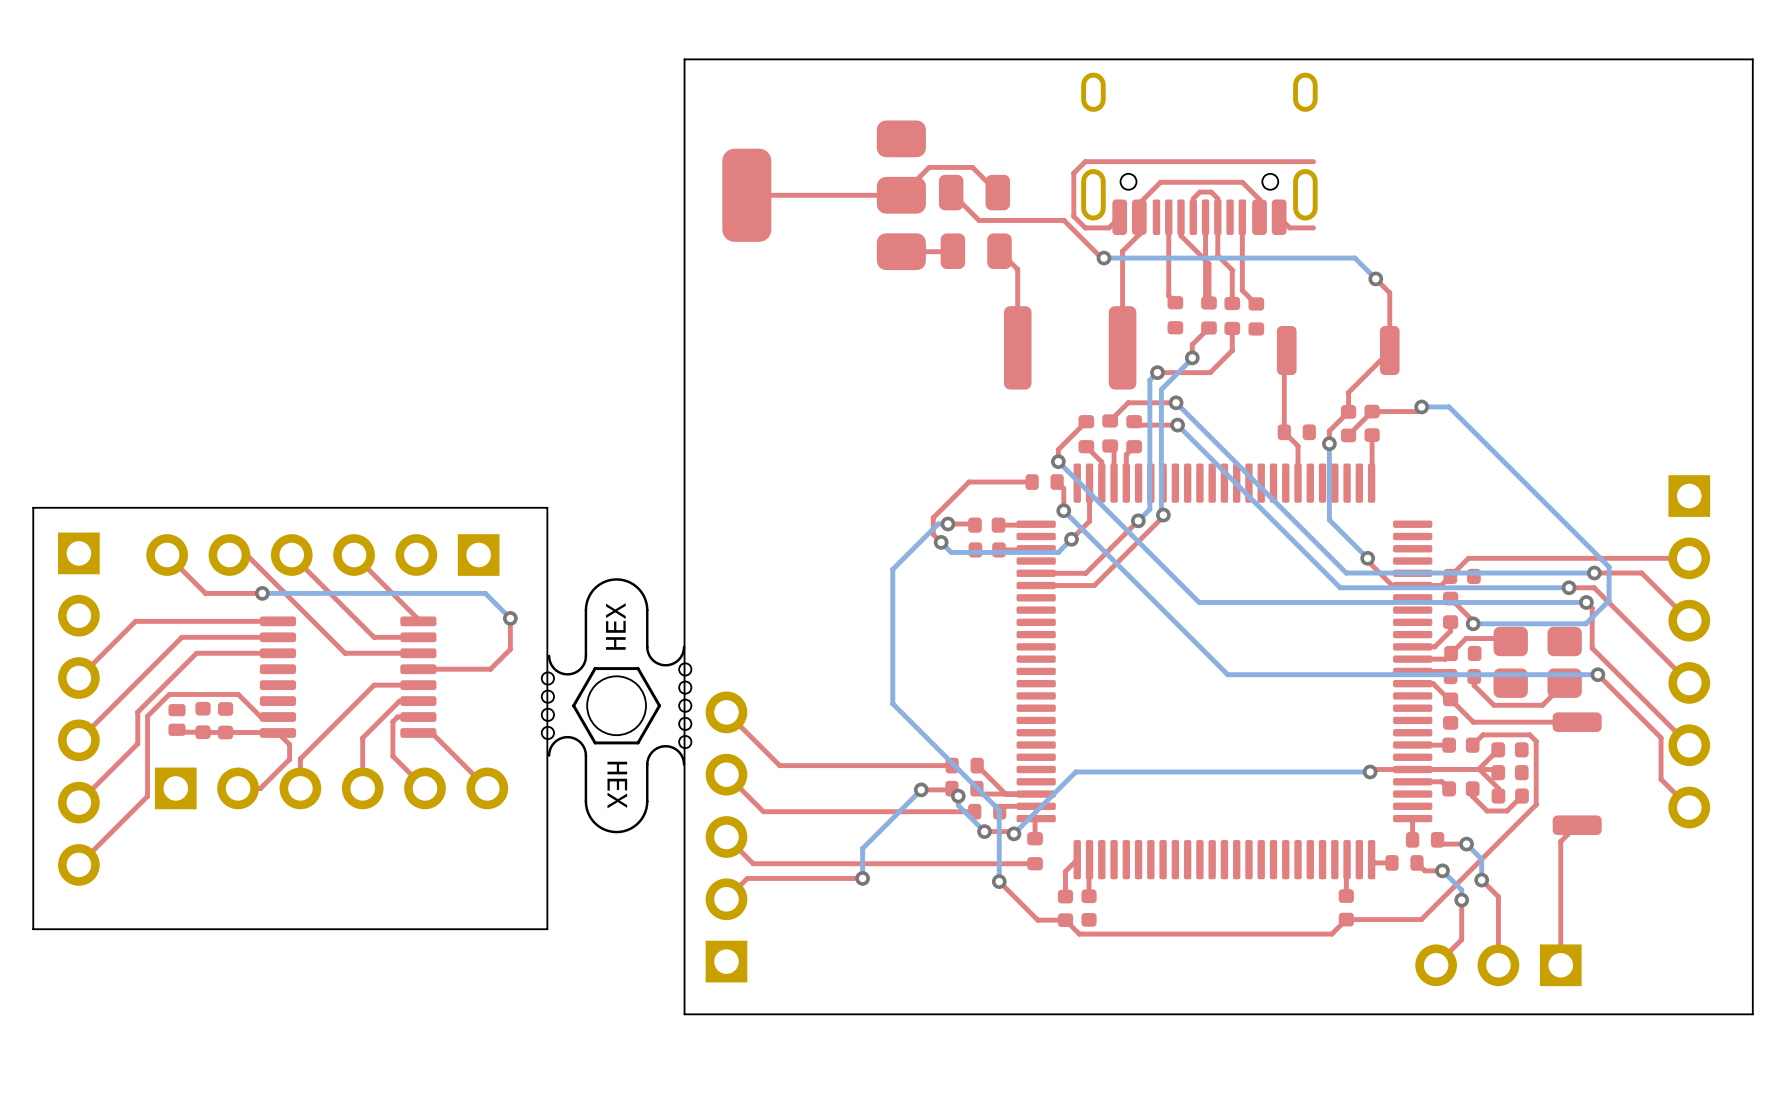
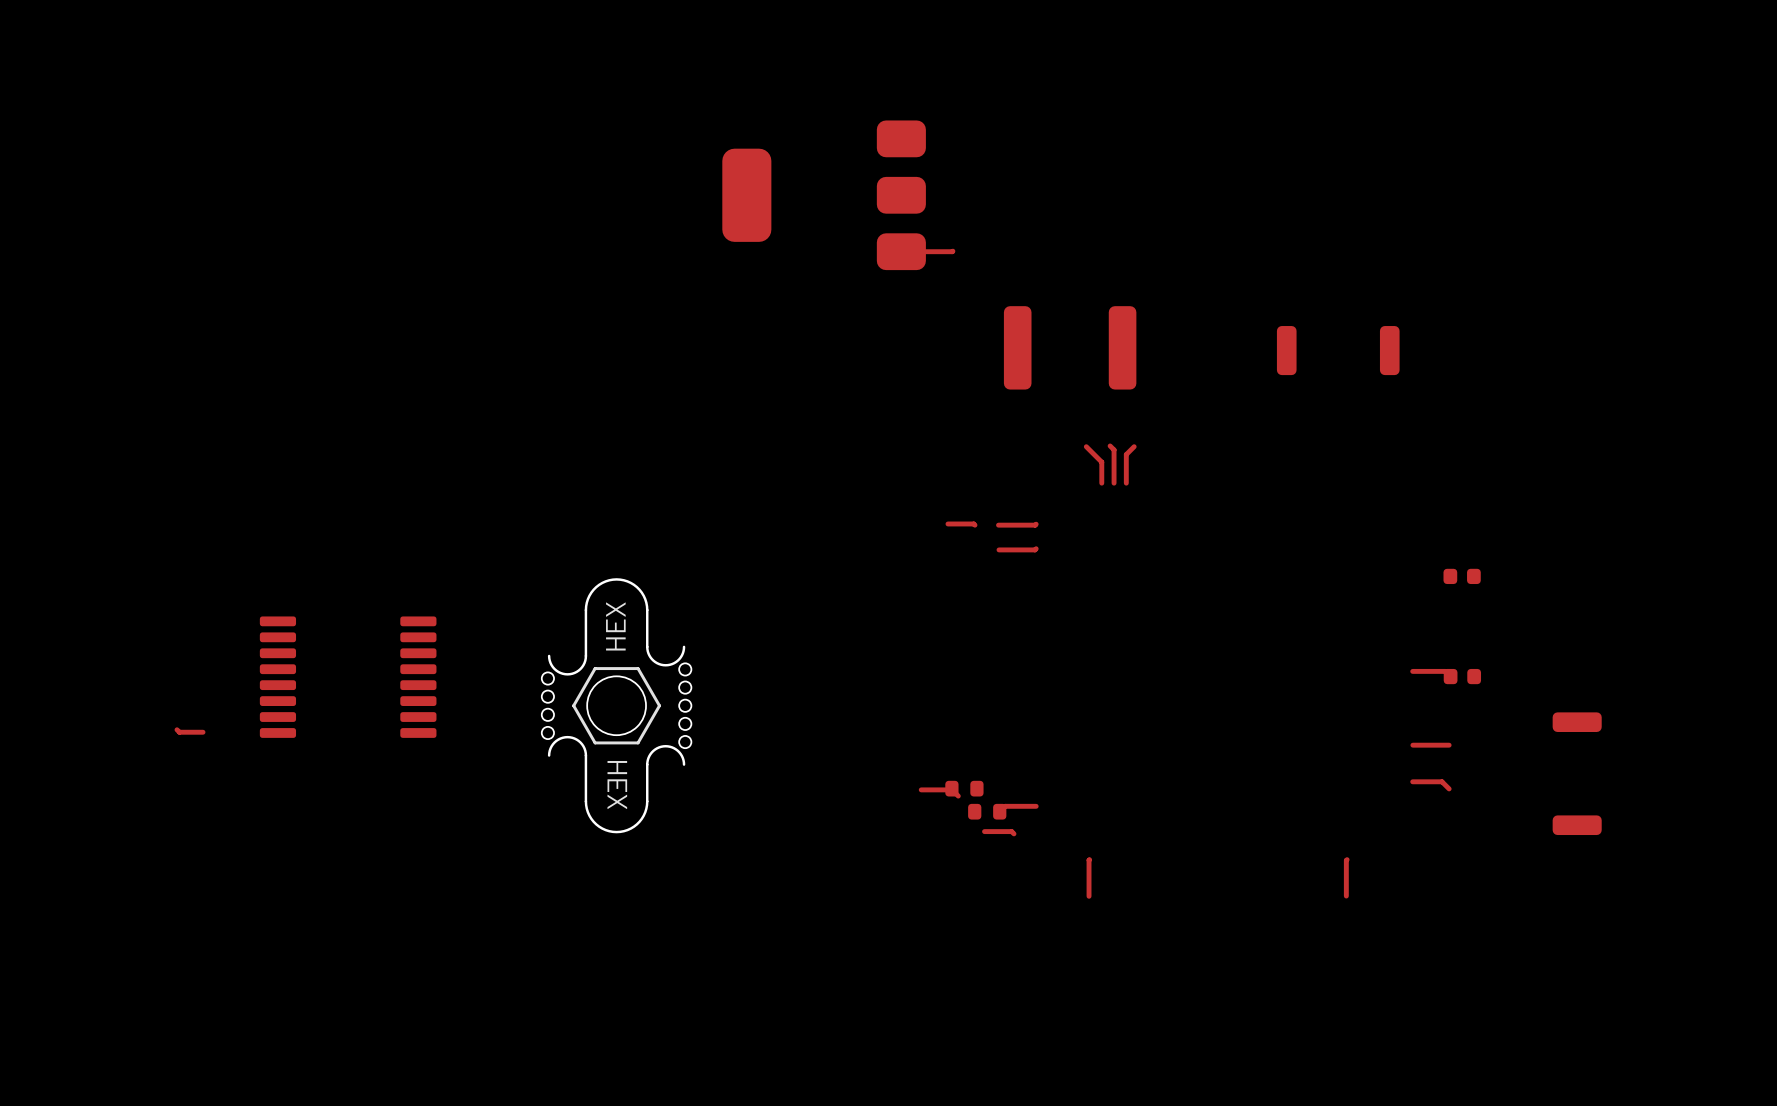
board edge: (1752, 59) (684, 59) (684, 1014) (1752, 1014) (1752, 59) -> none
part: (1199, 153) -> none
top track: (1313, 161) (1085, 161) (1073, 173) (1073, 216) (1085, 227) (1109, 227) (1119, 217) -> none
top track: (951, 192) (979, 220) (1064, 220) (1101, 258) (1103, 258) -> none
part: (974, 192) -> none
top track: (997, 192) (972, 167) (929, 167) (901, 195) (746, 195) -> none
top track: (1168, 217) (1168, 296) (1175, 302) -> none
top track: (1193, 217) (1193, 198) (1199, 192) (1211, 192) (1217, 198) (1217, 255) (1232, 270) (1232, 303) -> none
top track: (1205, 217) (1205, 299) (1208, 302) (1208, 263) (1181, 235) (1181, 217) -> none
top track: (1242, 217) (1242, 290) (1256, 303) -> none
top track: (1259, 217) (1259, 199) (1242, 182) (1160, 182) (1139, 203) (1139, 234) (1122, 251) (1122, 347) -> none
top track: (1279, 217) (1289, 227) (1313, 227) -> none
part: (976, 251) -> none
top track: (999, 251) (1017, 269) (1017, 347) -> none
bottom track: (1103, 258) (1354, 258) (1375, 278) -> none
via: (1103, 258) -> none
top track: (1375, 278) (1389, 292) (1389, 351) (1348, 392) (1348, 411) (1329, 431) (1329, 443) -> none
via: (1375, 278) -> none
part: (1175, 315) -> none
part: (1208, 315) -> none
part: (1232, 315) -> none
part: (1256, 316) -> none
top track: (1208, 327) (1192, 344) (1192, 357) -> none
top track: (1232, 328) (1232, 350) (1210, 372) (1157, 372) -> none
top track: (1286, 350) (1284, 353) (1284, 432) (1298, 445) (1298, 483) -> none
bottom track: (1192, 357) (1161, 389) (1161, 513) (1163, 515) -> none
via: (1192, 357) -> none
bottom track: (1157, 372) (1149, 380) (1149, 509) (1138, 520) -> none
via: (1157, 372) -> none
top track: (1176, 402) (1128, 402) (1110, 420) -> none
bottom track: (1176, 402) (1346, 573) (1594, 573) -> none
via: (1176, 402) -> none
top track: (1421, 406) (1417, 411) (1372, 411) (1348, 435) -> none
bottom track: (1421, 406) (1449, 406) (1609, 566) (1609, 600) (1585, 623) (1473, 623) -> none
via: (1421, 406) -> none
top track: (1086, 421) (1058, 449) (1058, 461) -> none
top track: (1134, 421) (1137, 425) (1177, 425) -> none
part: (1348, 423) -> none
part: (1372, 423) -> none
bottom track: (1177, 425) (1340, 587) (1569, 587) -> none
via: (1177, 425) -> none
part: (1296, 432) -> none
part: (1110, 433) -> none
part: (1086, 434) -> none
part: (1134, 434) -> none
top track: (1372, 435) (1371, 483) -> none
bottom track: (1329, 443) (1329, 520) (1367, 558) -> none
via: (1329, 443) -> none
bottom track: (1058, 461) (1199, 602) (1586, 602) -> none
via: (1058, 461) -> none
top track: (1032, 482) (969, 482) (933, 517) (933, 534) (941, 542) -> none
part: (1044, 482) -> none
top track: (1057, 482) (1063, 488) (1063, 510) -> none
top track: (1089, 483) (1089, 521) (1071, 539) -> none
board edge: (547, 507) (33, 507) (33, 929) (547, 929) (547, 507) -> none
bottom track: (1063, 510) (1227, 674) (1597, 674) -> none
via: (1063, 510) -> none
top track: (1163, 515) (1094, 585) (1036, 585) -> none
via: (1163, 515) -> none
top track: (1138, 520) (1085, 573) (1036, 573) -> none
via: (1138, 520) -> none
bottom track: (947, 523) (938, 523) (892, 569) (892, 703) (999, 810) (999, 881) -> none
via: (947, 523) -> none
part: (986, 525) -> none
bottom track: (1071, 539) (1058, 552) (951, 552) (941, 542) -> none
via: (1071, 539) -> none
via: (941, 542) -> none
part: (987, 549) -> none
top track: (167, 555) (205, 593) (262, 593) -> none
top track: (229, 555) (246, 555) (345, 653) (418, 653) -> none
top track: (291, 555) (374, 637) (418, 637) -> none
part: (322, 555) -> none
top track: (354, 555) (418, 621) -> none
via: (1367, 558) -> none
top track: (1689, 558) (1468, 558) (1441, 585) (1392, 585) (1367, 560) (1367, 558) -> none
top track: (1594, 573) (1641, 573) (1689, 620) -> none
via: (1594, 573) -> none
top track: (1569, 587) (1594, 587) (1689, 682) -> none
via: (1569, 587) -> none
bottom track: (262, 593) (485, 593) (510, 618) -> none
via: (262, 593) -> none
top track: (1450, 598) (1473, 621) (1473, 623) -> none
top track: (1586, 602) (1592, 608) (1592, 648) (1689, 745) -> none
via: (1586, 602) -> none
part: (1450, 610) -> none
top track: (510, 618) (510, 649) (490, 669) (418, 669) -> none
via: (510, 618) -> none
top track: (277, 621) (135, 621) (78, 678) -> none
top track: (1450, 622) (1450, 631) (1434, 646) (1412, 646) -> none
via: (1473, 623) -> none
top track: (277, 637) (181, 637) (78, 740) -> none
top track: (1510, 641) (1507, 638) (1466, 638) (1445, 659) (1412, 659) -> none
part: (1689, 651) -> none
top track: (277, 653) (196, 653) (137, 712) (137, 743) (78, 802) -> none
part: (1462, 653) -> none
part: (1537, 662) -> none
part: (1224, 671) -> none
top track: (1597, 674) (1661, 737) (1661, 779) (1689, 807) -> none
via: (1597, 674) -> none
top track: (1474, 676) (1474, 685) (1493, 705) (1542, 705) (1564, 683) -> none
top track: (1412, 683) (1433, 683) (1473, 722) (1577, 722) -> none
top track: (418, 685) (374, 685) (300, 758) (300, 788) -> none
top track: (418, 701) (399, 701) (362, 737) (362, 788) -> none
part: (78, 709) -> none
part: (1450, 711) -> none
top track: (726, 712) (779, 765) (952, 765) -> none
top track: (277, 717) (260, 717) (238, 694) (169, 694) (147, 716) (147, 796) (78, 864) -> none
top track: (418, 717) (397, 717) (392, 721) (392, 756) (425, 788) -> none
part: (177, 719) -> none
part: (203, 720) -> none
part: (225, 720) -> none
top track: (203, 732) (277, 732) (289, 744) (289, 759) -> none
top track: (418, 732) (431, 732) (487, 788) -> none
part: (1460, 745) -> none
top track: (1472, 745) (1482, 734) (1529, 734) (1536, 741) (1536, 804) (1421, 919) (1346, 919) (1331, 934) (1079, 934) (1065, 920) (1037, 920) (999, 881) -> none
top track: (1498, 749) (1478, 769) -> none
part: (1509, 749) -> none
top track: (289, 759) (260, 788) (238, 788) -> none
part: (964, 765) -> none
top track: (977, 765) (1005, 794) -> none
top track: (1479, 769) (1498, 788) (1498, 796) -> none
top track: (1370, 771) (1372, 769) (1495, 769) (1498, 772) -> none
bottom track: (1370, 771) (1075, 771) (1013, 833) -> none
via: (1370, 771) -> none
part: (1509, 772) -> none
top track: (726, 774) (763, 811) (974, 811) -> none
part: (331, 788) -> none
top track: (976, 788) (982, 794) (1036, 794) -> none
part: (1460, 788) -> none
top track: (1472, 788) (1472, 796) (1487, 810) (1507, 810) (1521, 796) -> none
bottom track: (921, 789) (862, 848) (862, 878) -> none
via: (921, 789) -> none
bottom track: (958, 796) (958, 805) (984, 831) -> none
via: (958, 796) -> none
part: (1510, 796) -> none
top track: (1036, 818) (1035, 838) -> none
top track: (1412, 818) (1412, 839) -> none
top track: (1577, 825) (1560, 841) (1560, 965) -> none
via: (984, 831) -> none
via: (1013, 833) -> none
top track: (726, 836) (753, 863) (1035, 863) -> none
part: (726, 836) -> none
part: (1425, 839) -> none
top track: (1437, 839) (1441, 844) (1466, 844) -> none
bottom track: (1466, 844) (1481, 859) (1481, 880) -> none
via: (1466, 844) -> none
part: (1035, 851) -> none
top track: (1077, 859) (1065, 871) (1065, 896) -> none
top track: (1371, 859) (1374, 862) (1391, 862) -> none
part: (1404, 862) -> none
top track: (1416, 862) (1424, 870) (1442, 870) -> none
bottom track: (1442, 870) (1461, 890) (1461, 900) -> none
via: (1442, 870) -> none
top track: (862, 878) (747, 878) (726, 899) -> none
via: (862, 878) -> none
top track: (1481, 880) (1498, 896) (1498, 965) -> none
via: (1481, 880) -> none
via: (999, 881) -> none
top track: (1461, 900) (1461, 939) (1436, 965) -> none
via: (1461, 900) -> none
part: (1346, 907) -> none
part: (1065, 908) -> none
part: (1089, 908) -> none
part: (1498, 965) -> none

